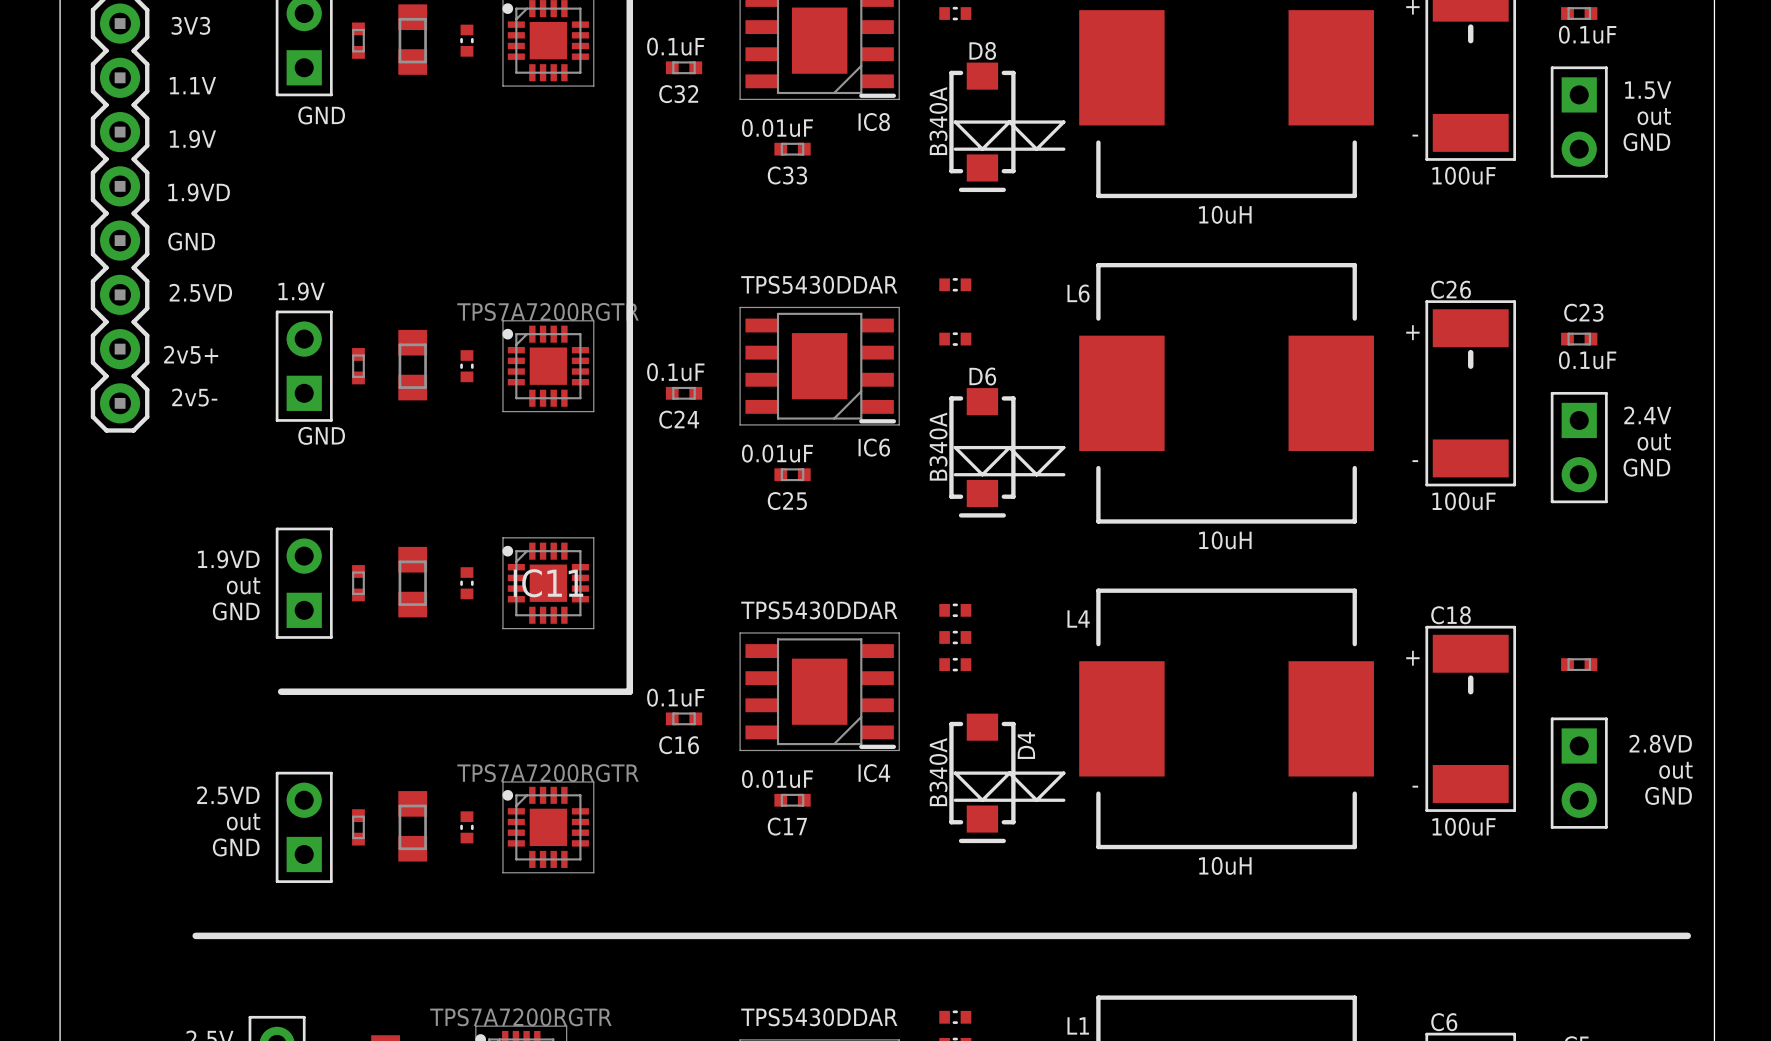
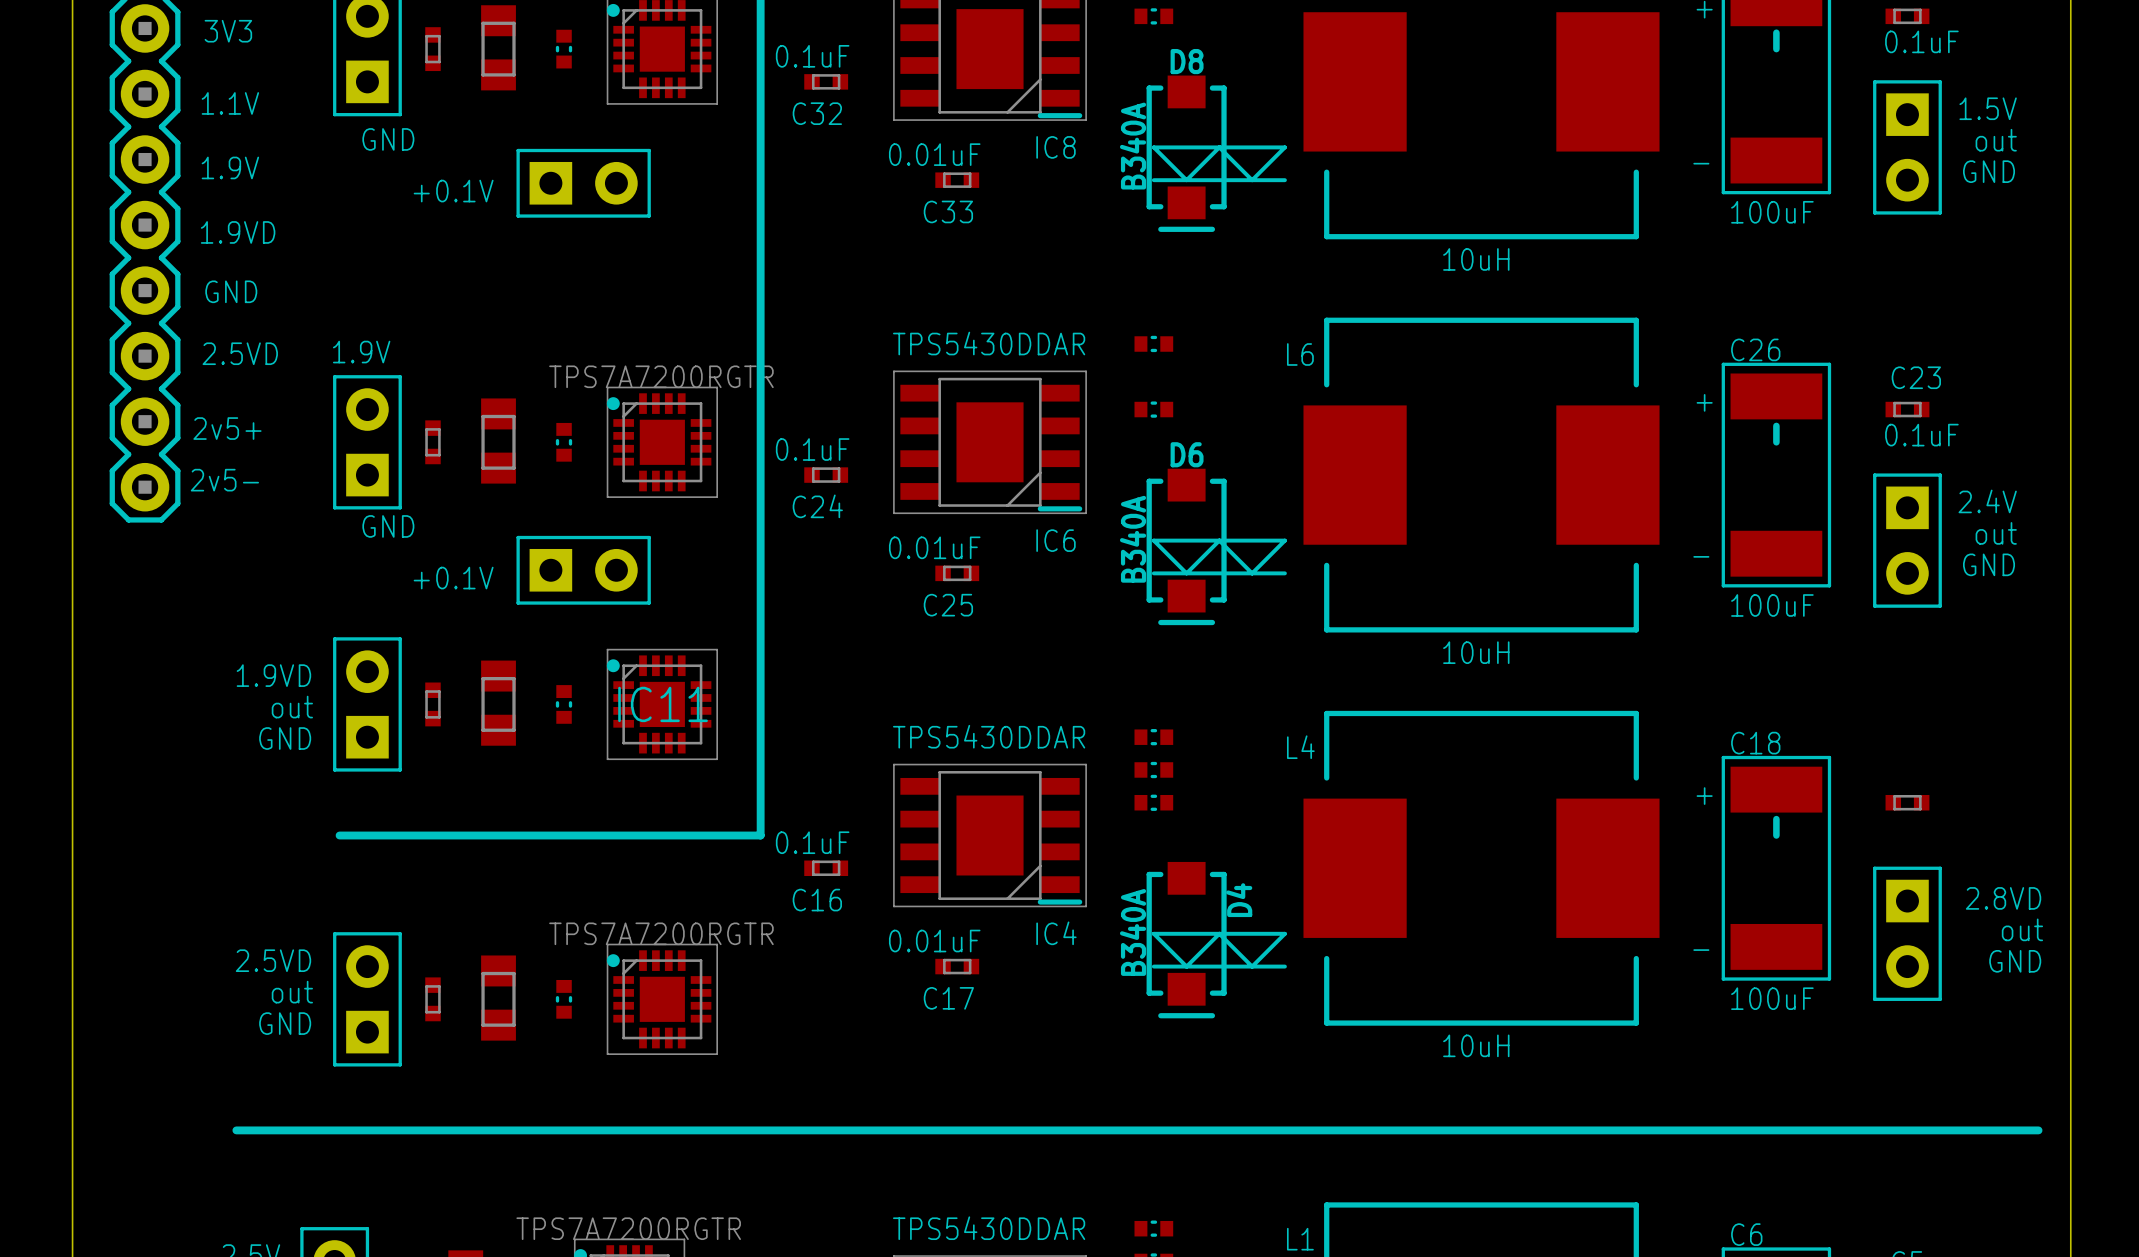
part: none -> (583, 183)
text: none -> +0.1V (453, 191)
part: none -> (583, 570)
text: none -> +0.1V (453, 578)

